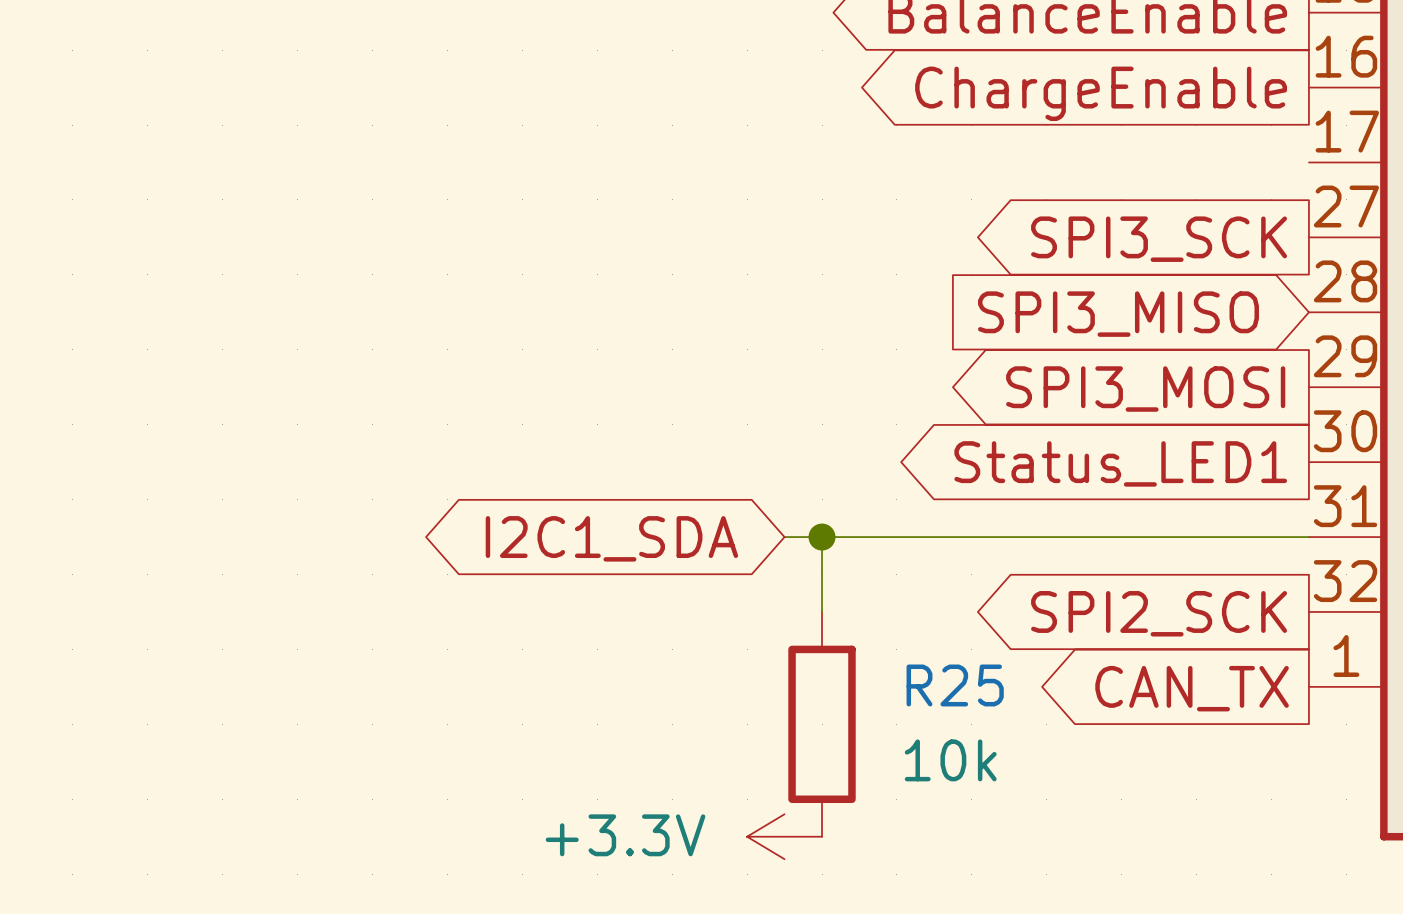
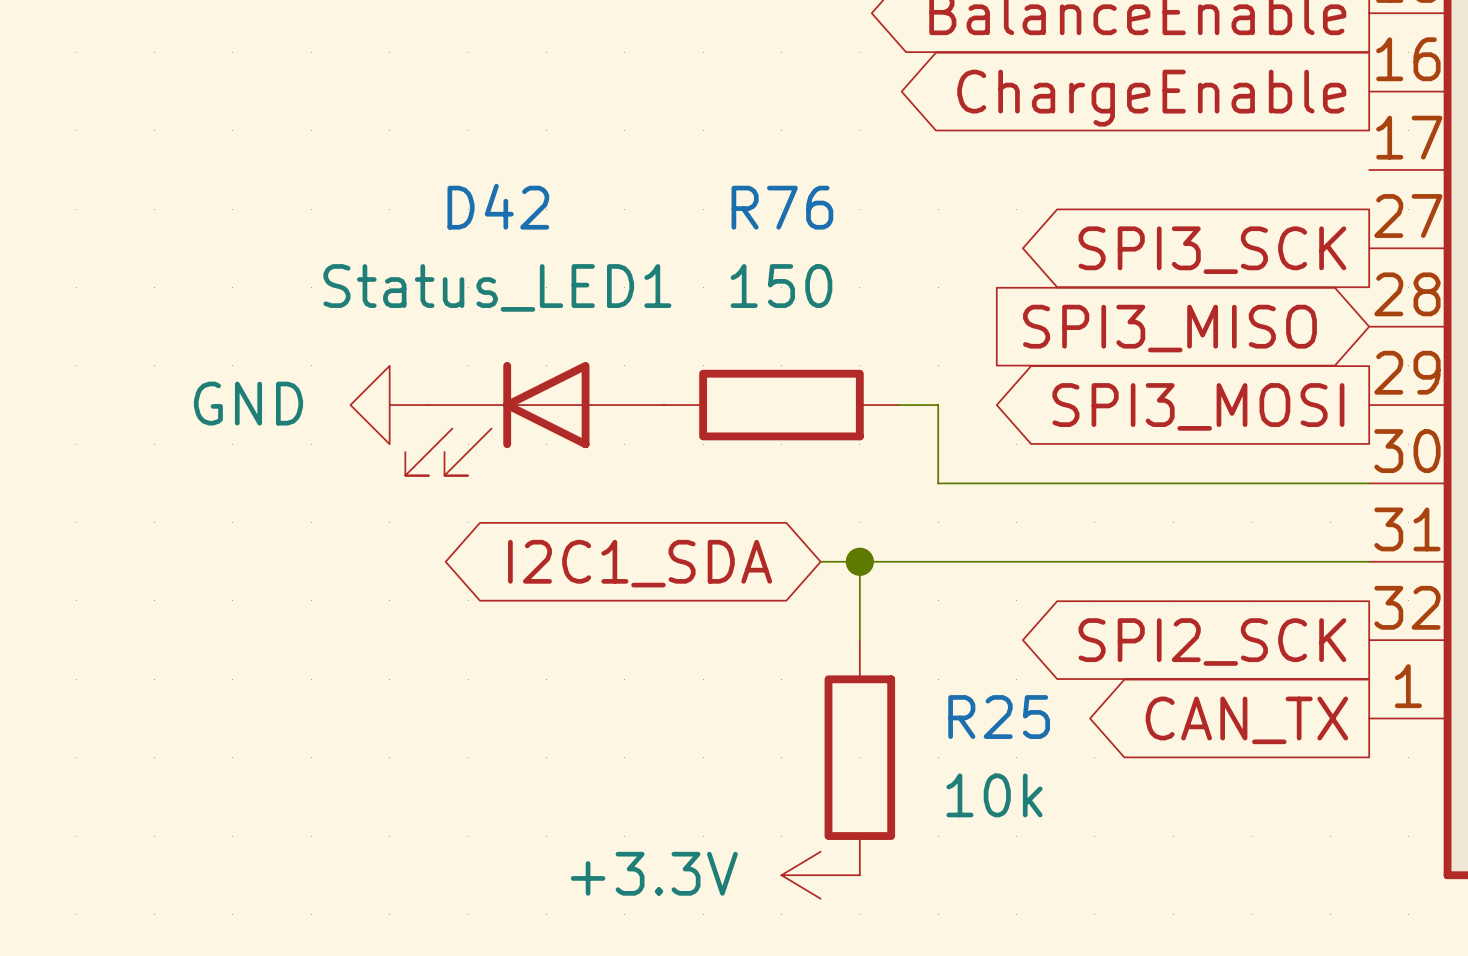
power symbol: none -> GND (389, 405)
R76: none -> 150 (781, 405)
wire: none -> (899, 405) (938, 405) (938, 483) (1369, 483)
D42: none -> Status_LED1 (534, 418)
global label: Status_LED1 (1120, 463) -> none

